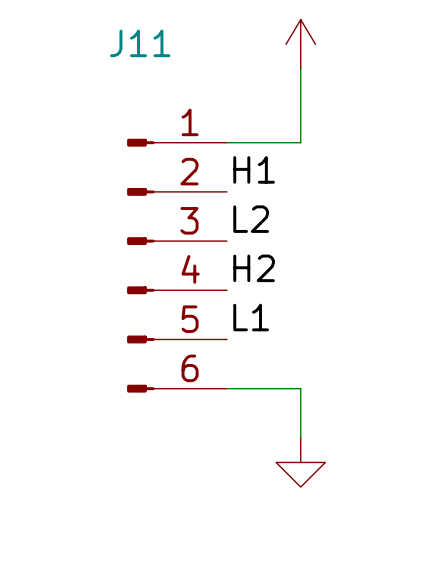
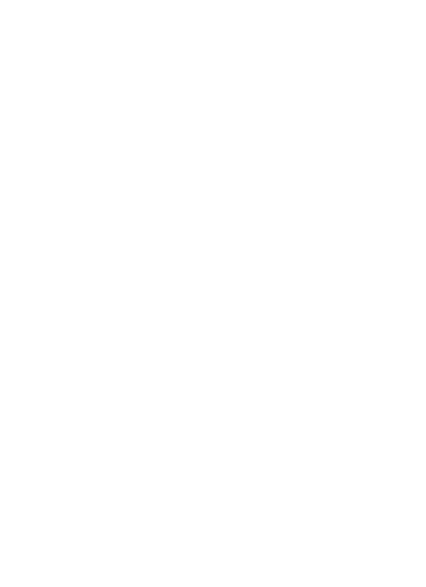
power symbol: (300, 44) -> none
wire: (300, 68) (300, 142) (226, 142) -> none
label: H1 (254, 169) -> none
label: L2 (251, 219) -> none
J11: (177, 265) -> none
label: H2 (254, 268) -> none
label: L1 (251, 317) -> none
wire: (226, 388) (300, 388) (300, 437) -> none
power symbol: (300, 462) -> none

